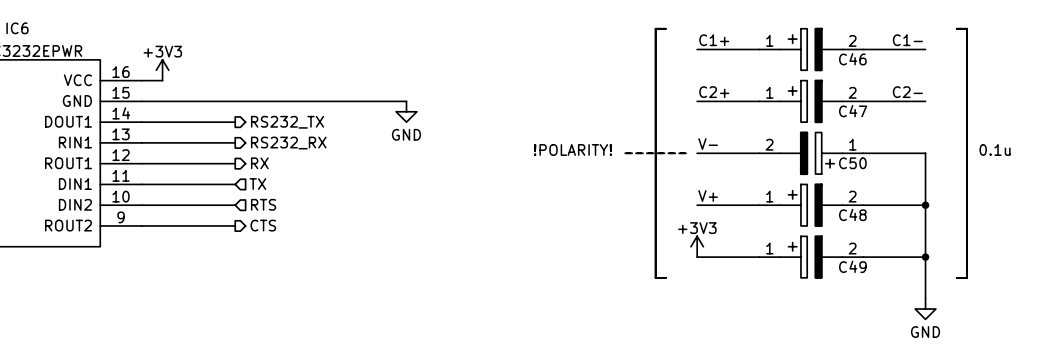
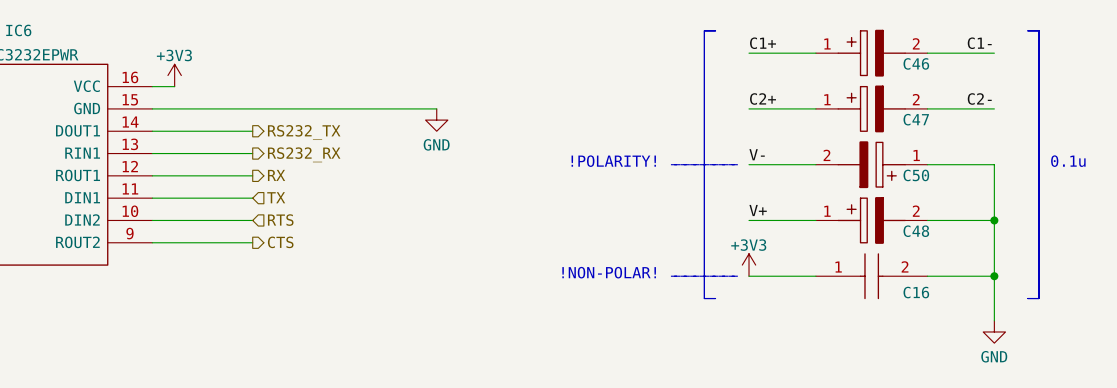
text: none -> !NON-POLAR! (609, 272)
line: none -> (670, 276) (737, 276)
C49: (811, 257) -> none
C16: none -> (871, 276)

